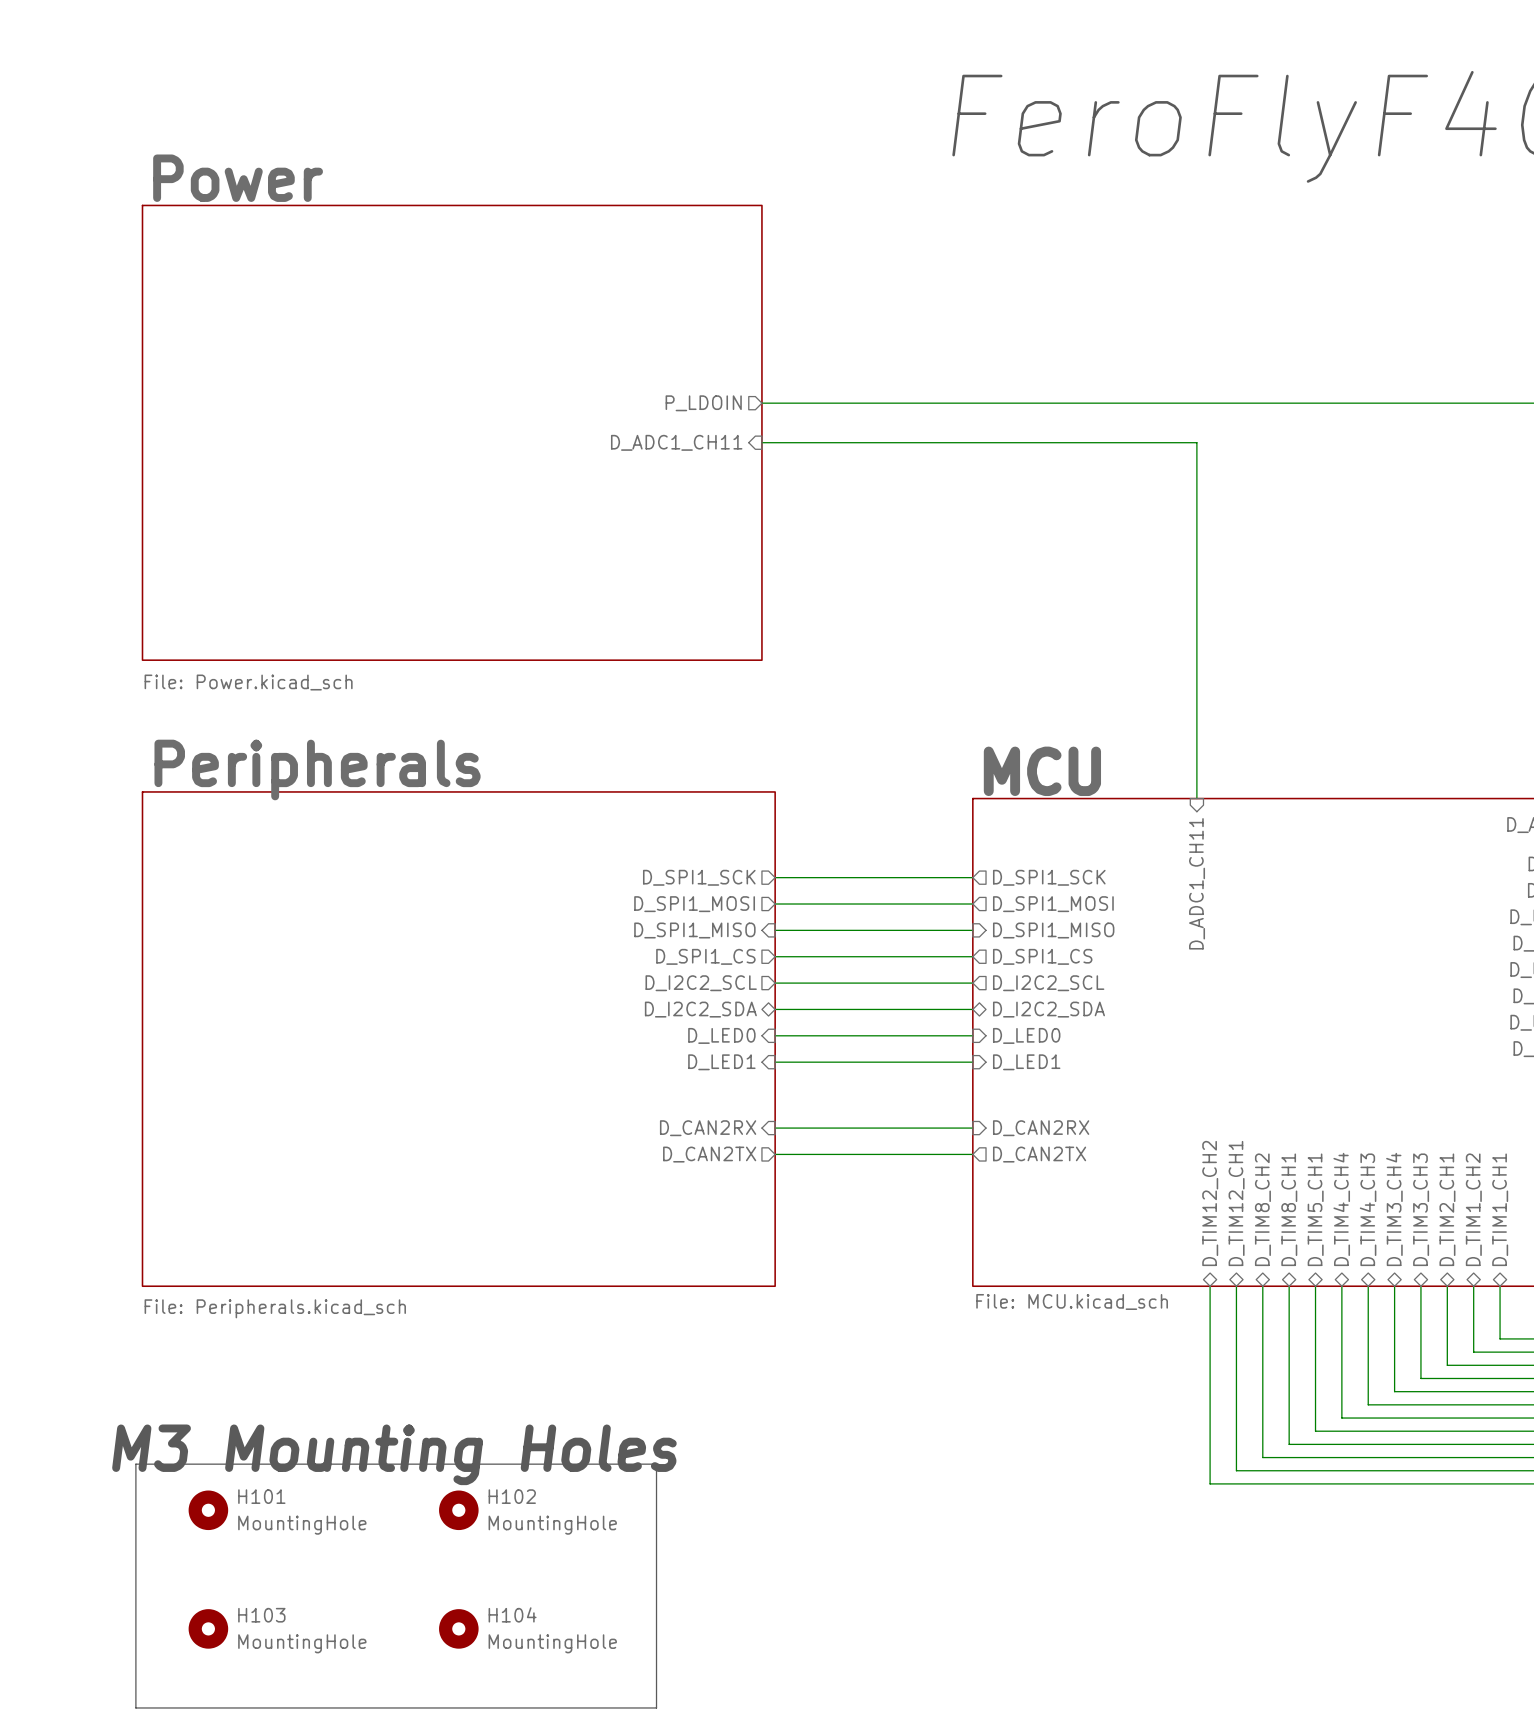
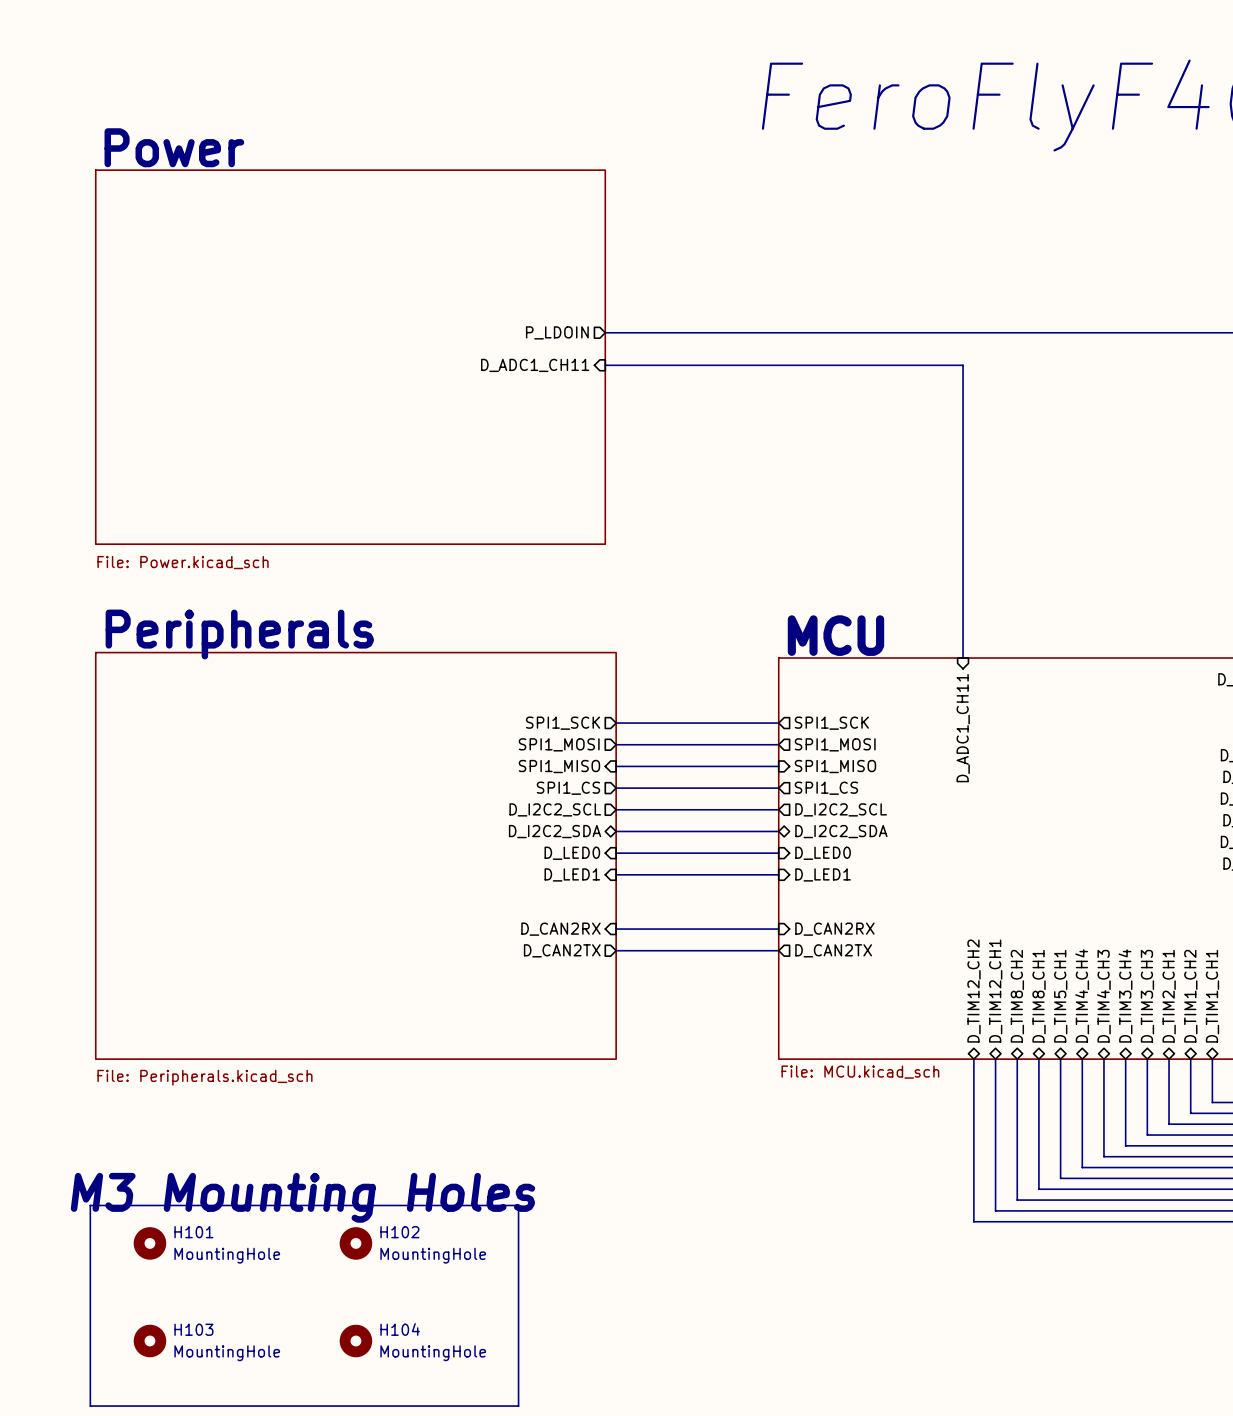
sheet pin: D_SPI1_SCK (699, 877) -> SPI1_SCK (563, 723)
sheet pin: D_SPI1_SCK (1049, 877) -> SPI1_SCK (831, 723)
sheet pin: D_SPI1_MOSI (694, 904) -> SPI1_MOSI (559, 744)
sheet pin: D_SPI1_MOSI (1053, 904) -> SPI1_MOSI (835, 744)
sheet pin: D_SPI1_MISO (694, 930) -> SPI1_MISO (559, 766)
sheet pin: D_SPI1_MISO (1053, 930) -> SPI1_MISO (835, 766)
sheet pin: D_SPI1_CS (705, 956) -> SPI1_CS (568, 788)
sheet pin: D_SPI1_CS (1042, 956) -> SPI1_CS (826, 788)

